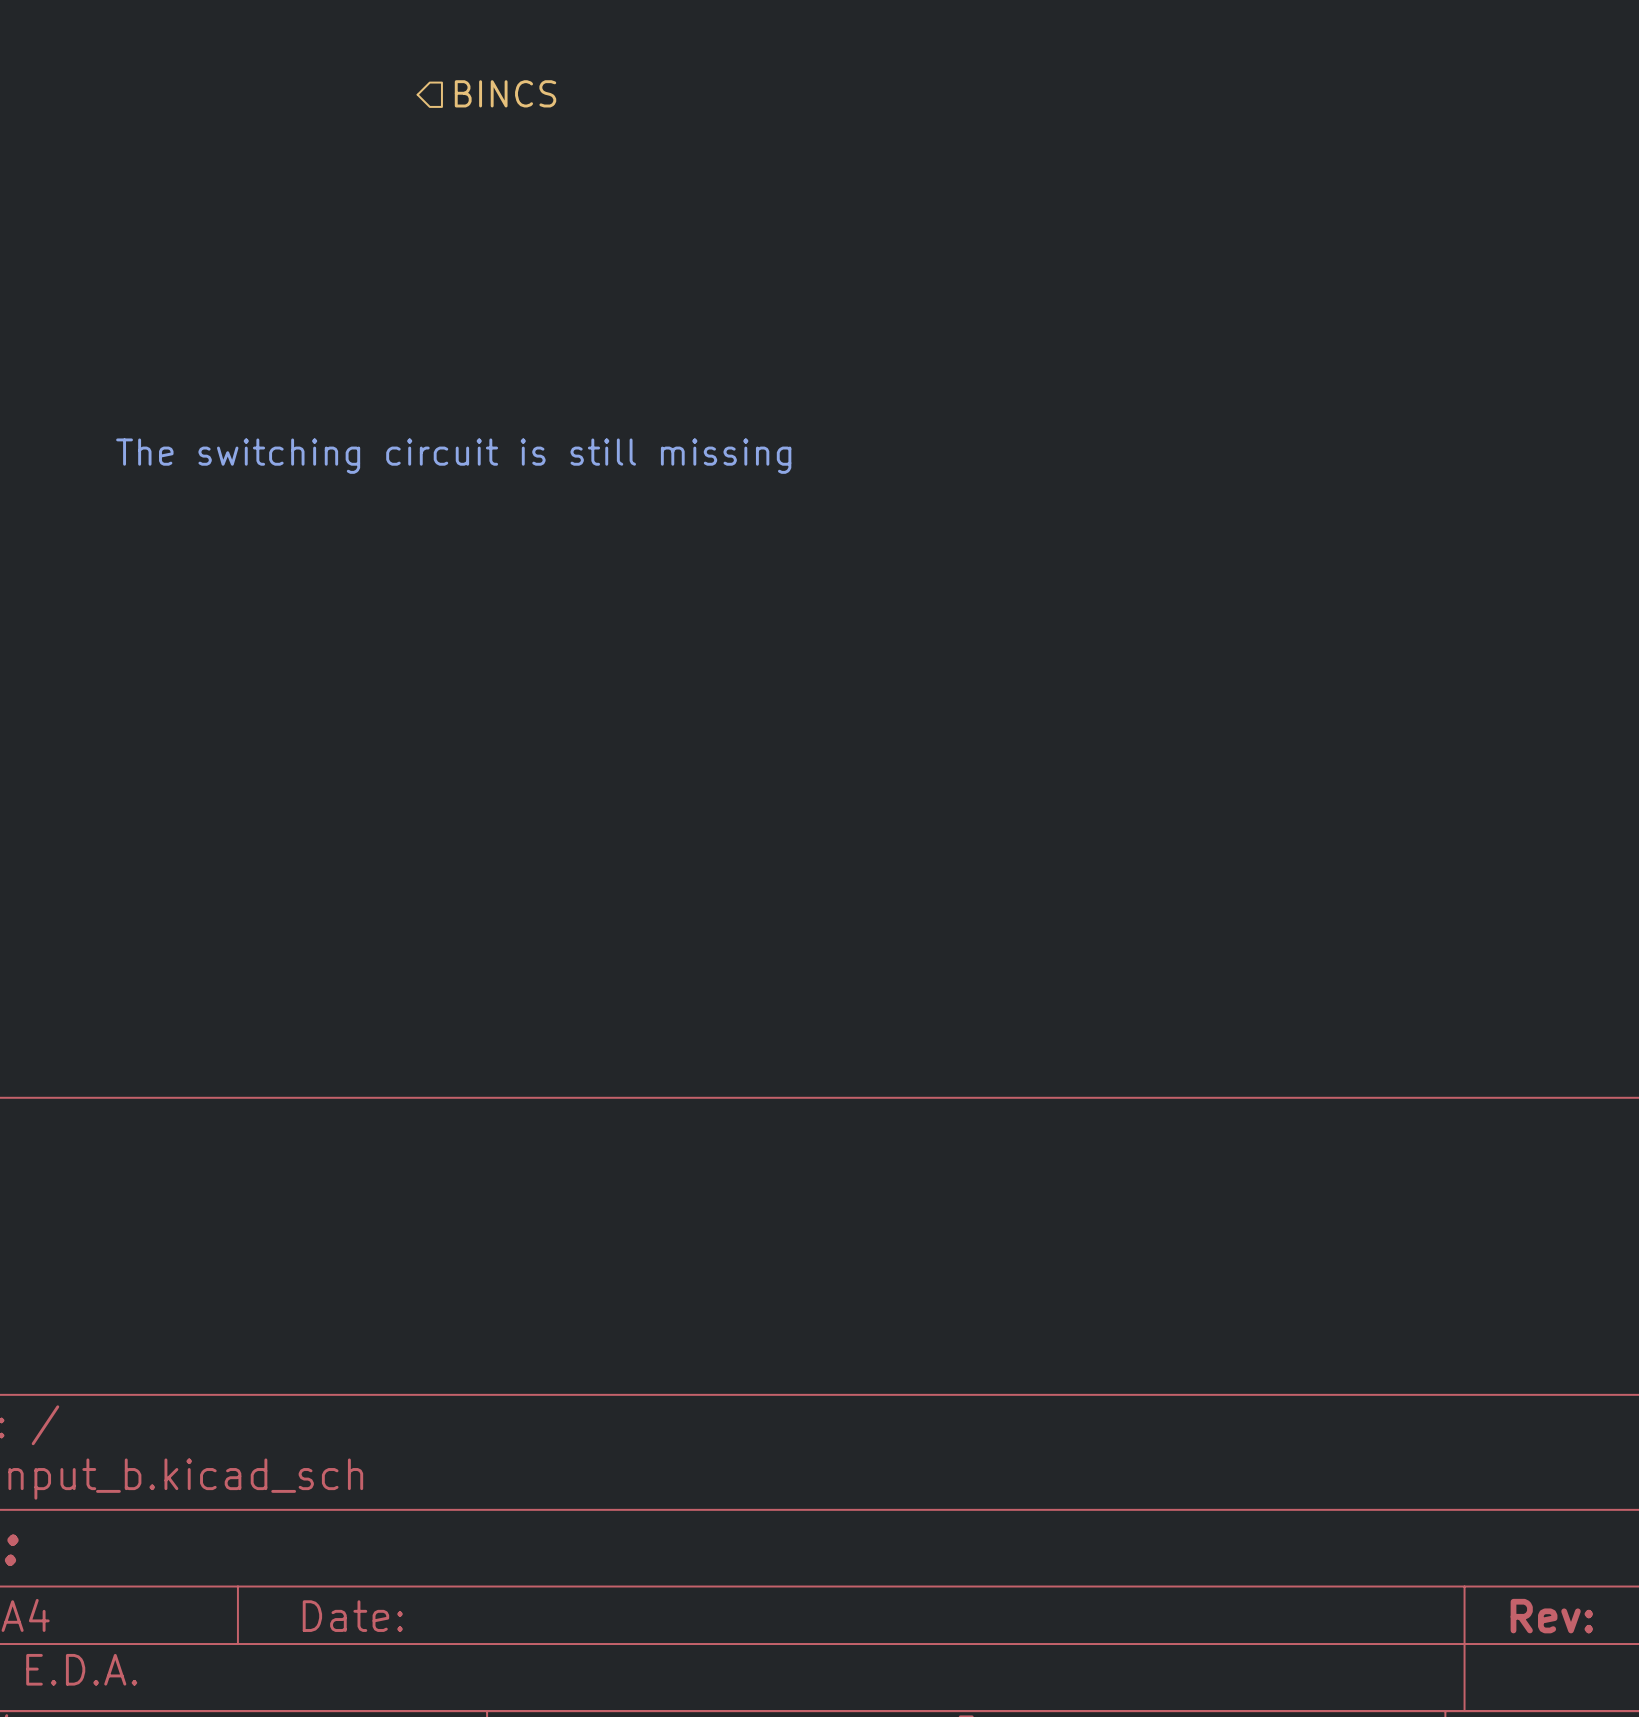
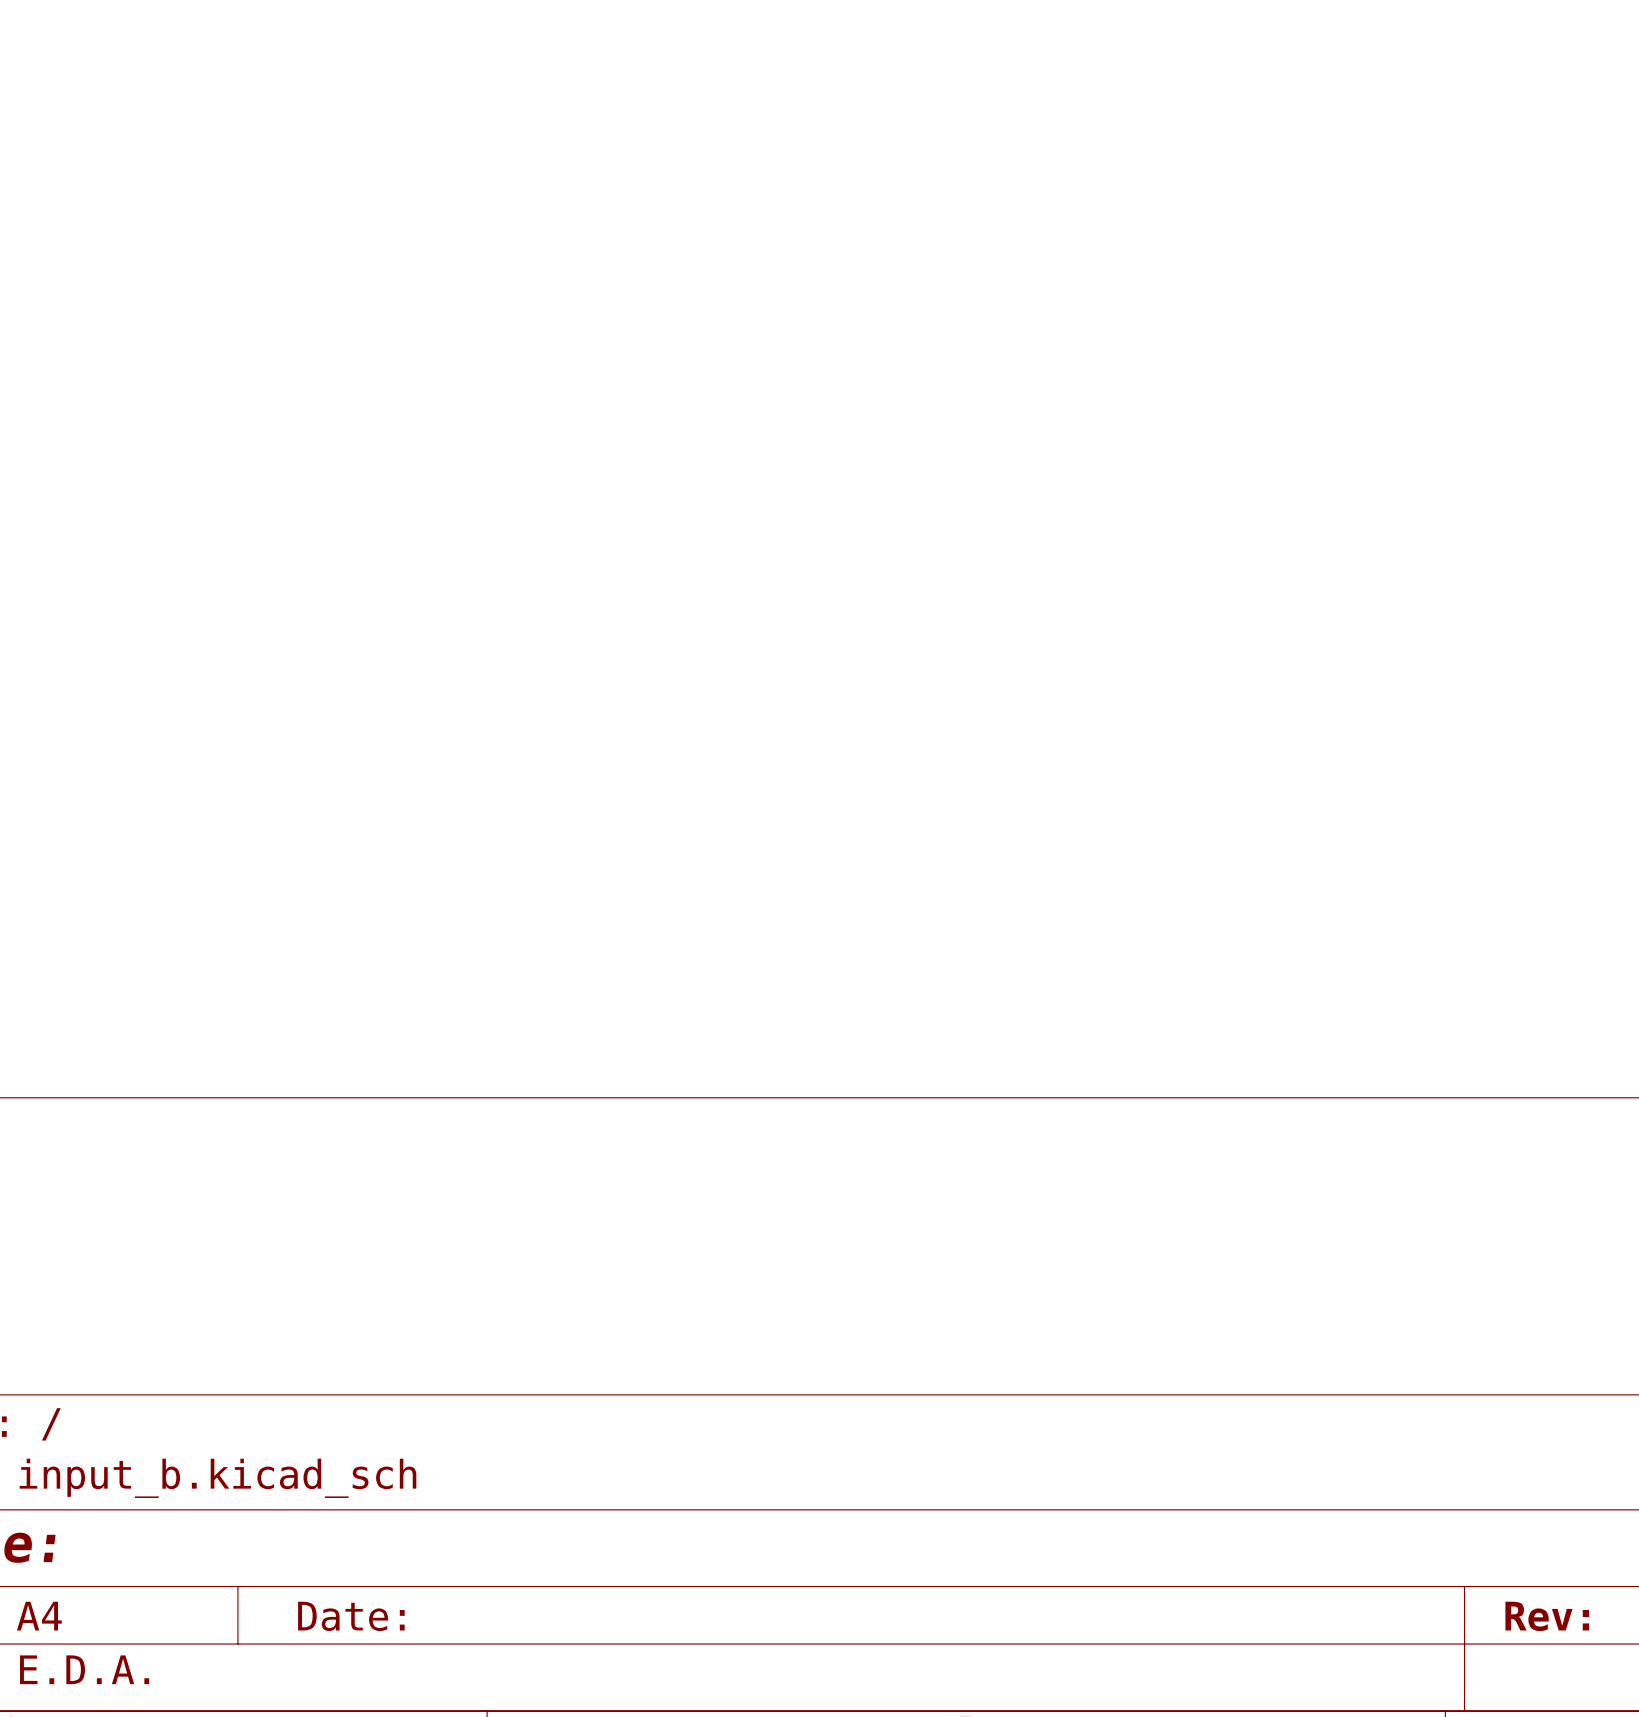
hierarchical label: BINCS (505, 93) -> none
text: The switching circuit is still missing (453, 456) -> none

